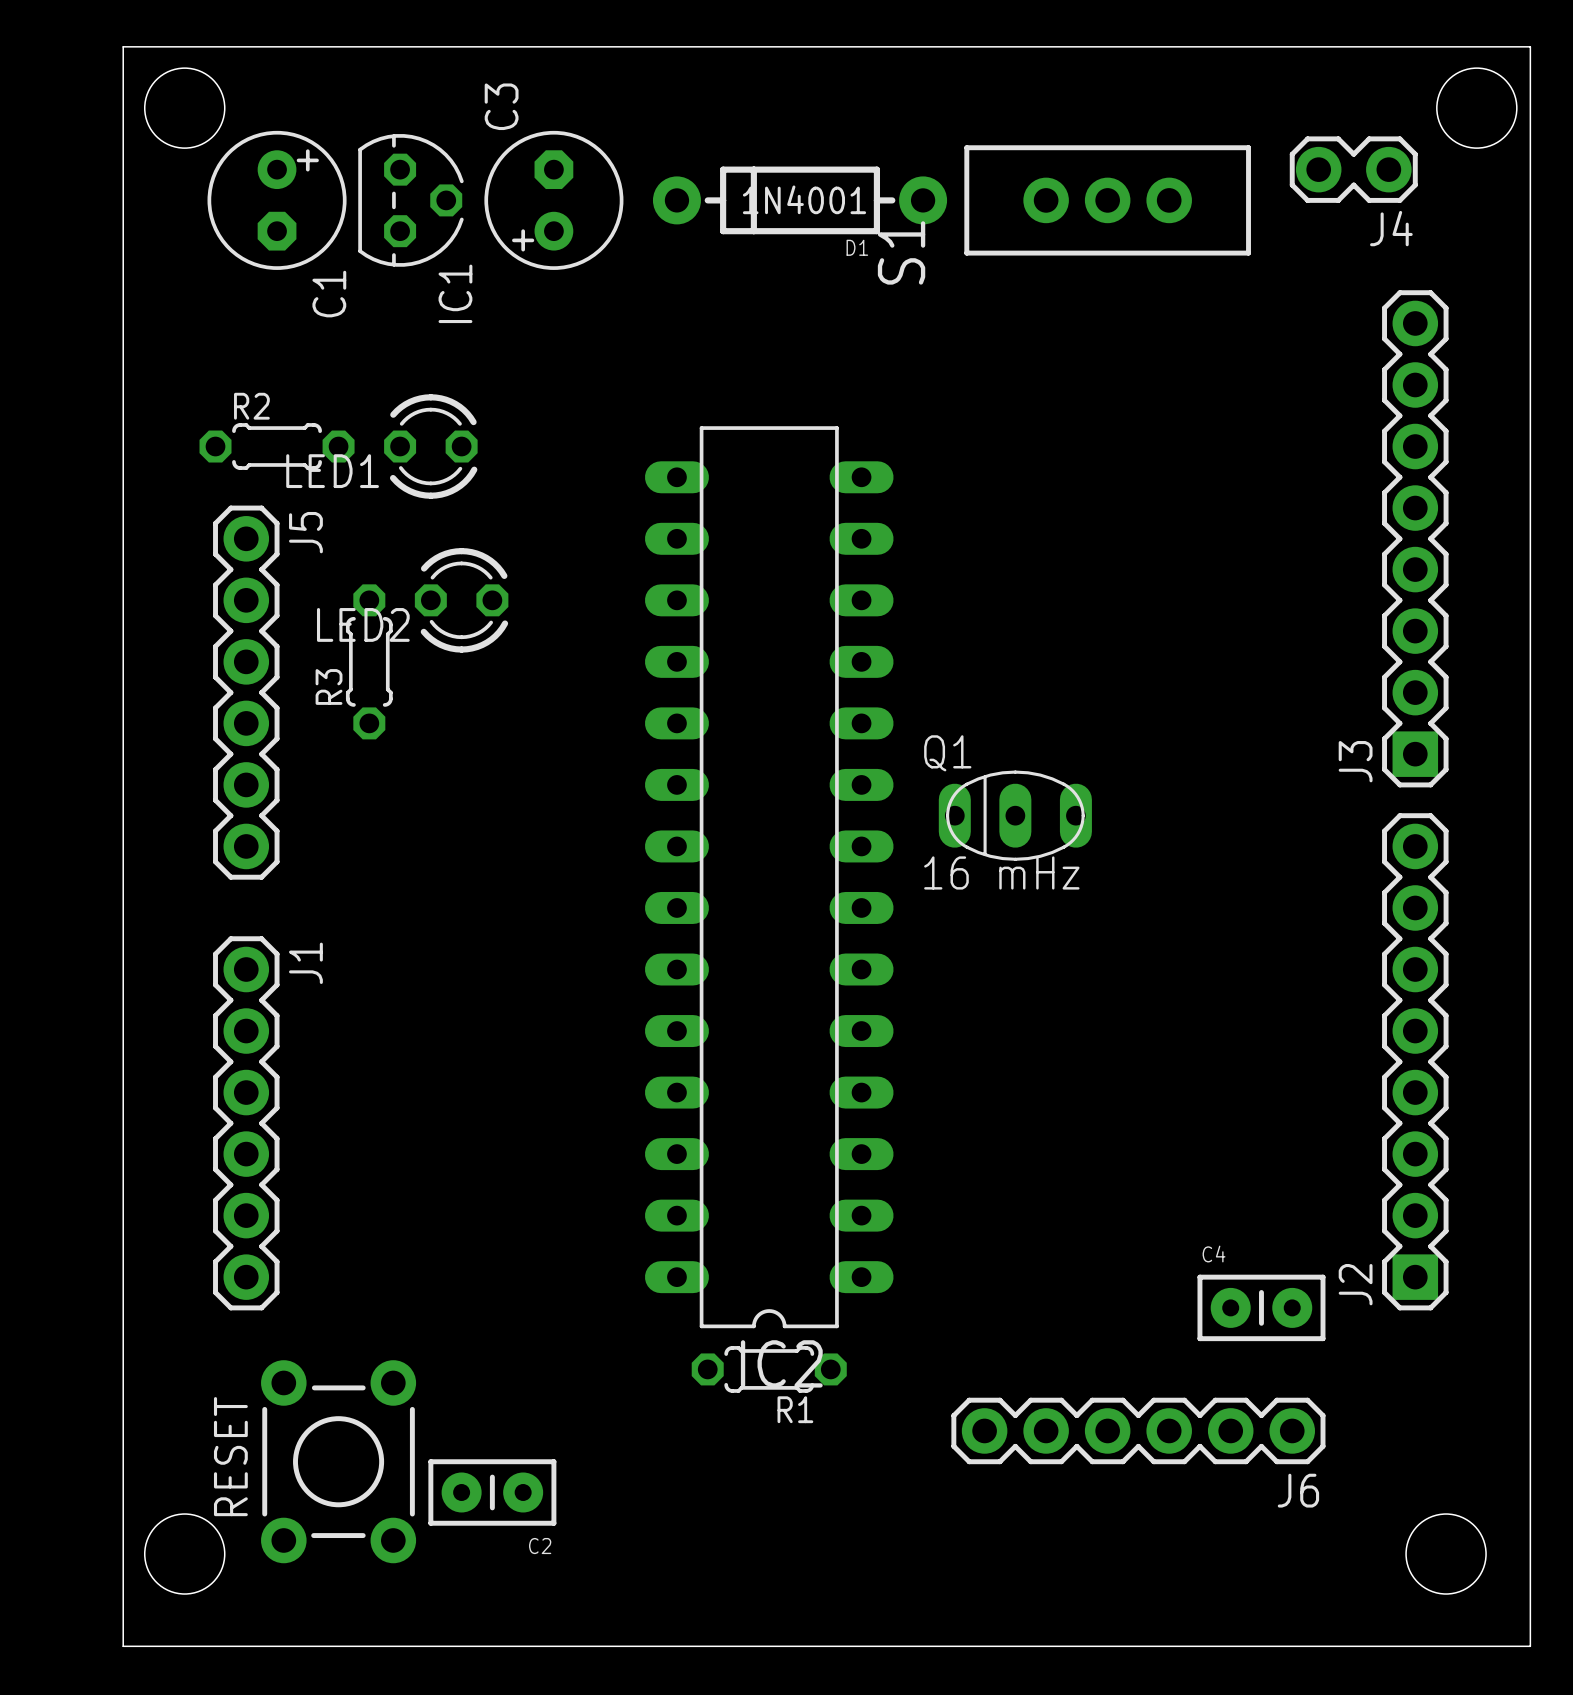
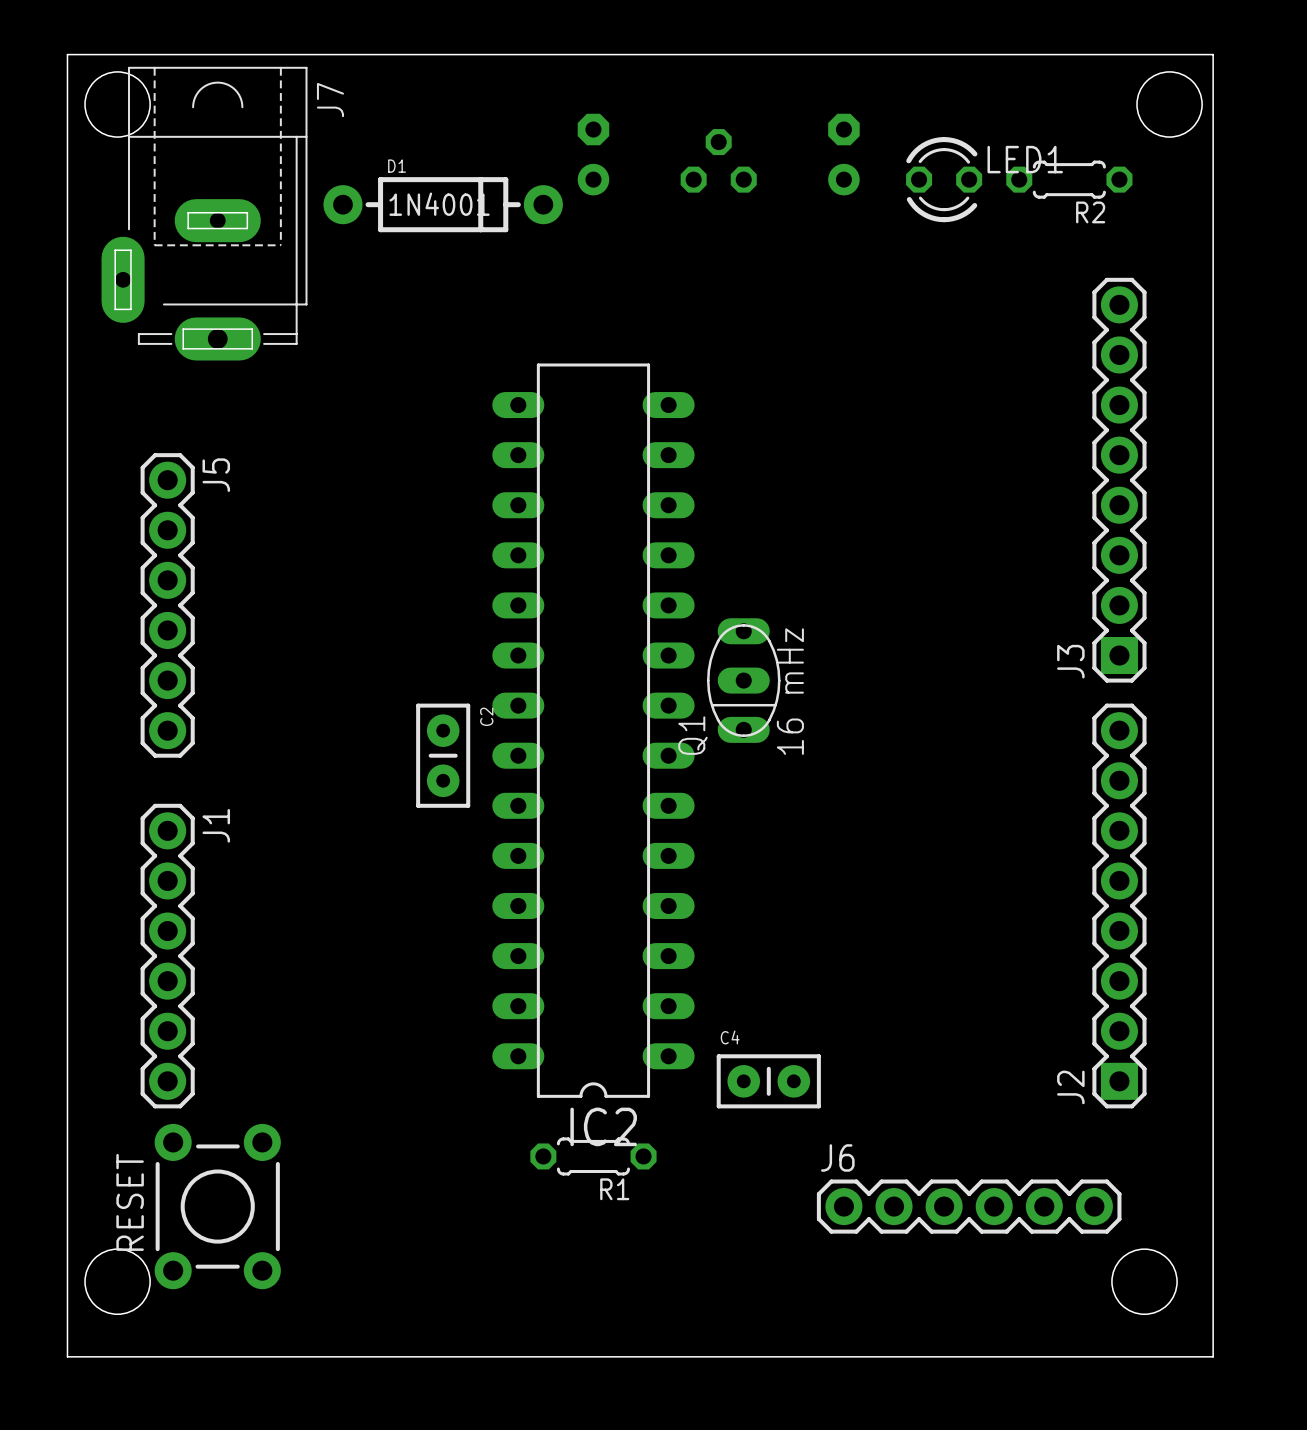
part: none -> (843, 154)
J4: (1353, 169) -> none
C1: (277, 200) -> none
IC1 side: top (410, 200) -> bottom (718, 160)
C3 side: top (553, 200) -> bottom (593, 154)
D1 rotation: 0° (800, 200) -> 180° (443, 204)
D1 position: (800, 200) -> (443, 204)
S1: (1107, 200) -> none
J7: none -> (204, 213)
R2 name position: R2 (251, 406) -> R2 (1090, 212)
R2 position: (277, 446) -> (1069, 179)
LED1 rotation: 0° (430, 446) -> 180° (944, 179)
LED1 position: (430, 446) -> (944, 179)
J3 position: (1415, 538) -> (1119, 480)
LED2: (461, 600) -> none
R3: (369, 661) -> none
J5 position: (246, 692) -> (167, 605)
Q1 rotation: 0° (1015, 815) -> 90° counterclockwise (743, 680)
J2 position: (1415, 1061) -> (1119, 905)
J1 position: (246, 1123) -> (167, 956)
C4 position: (1261, 1307) -> (768, 1081)
R1 position: (769, 1369) -> (593, 1156)
J6 position: (1138, 1430) -> (969, 1206)
RESET position: (338, 1461) -> (217, 1206)
J6 name position: J6 (1298, 1490) -> J6 (837, 1157)
C2 rotation: 0° (492, 1492) -> 90° clockwise (443, 755)
C2 position: (492, 1492) -> (443, 755)
C2 name position: C2 (540, 1546) -> C2 (486, 716)

